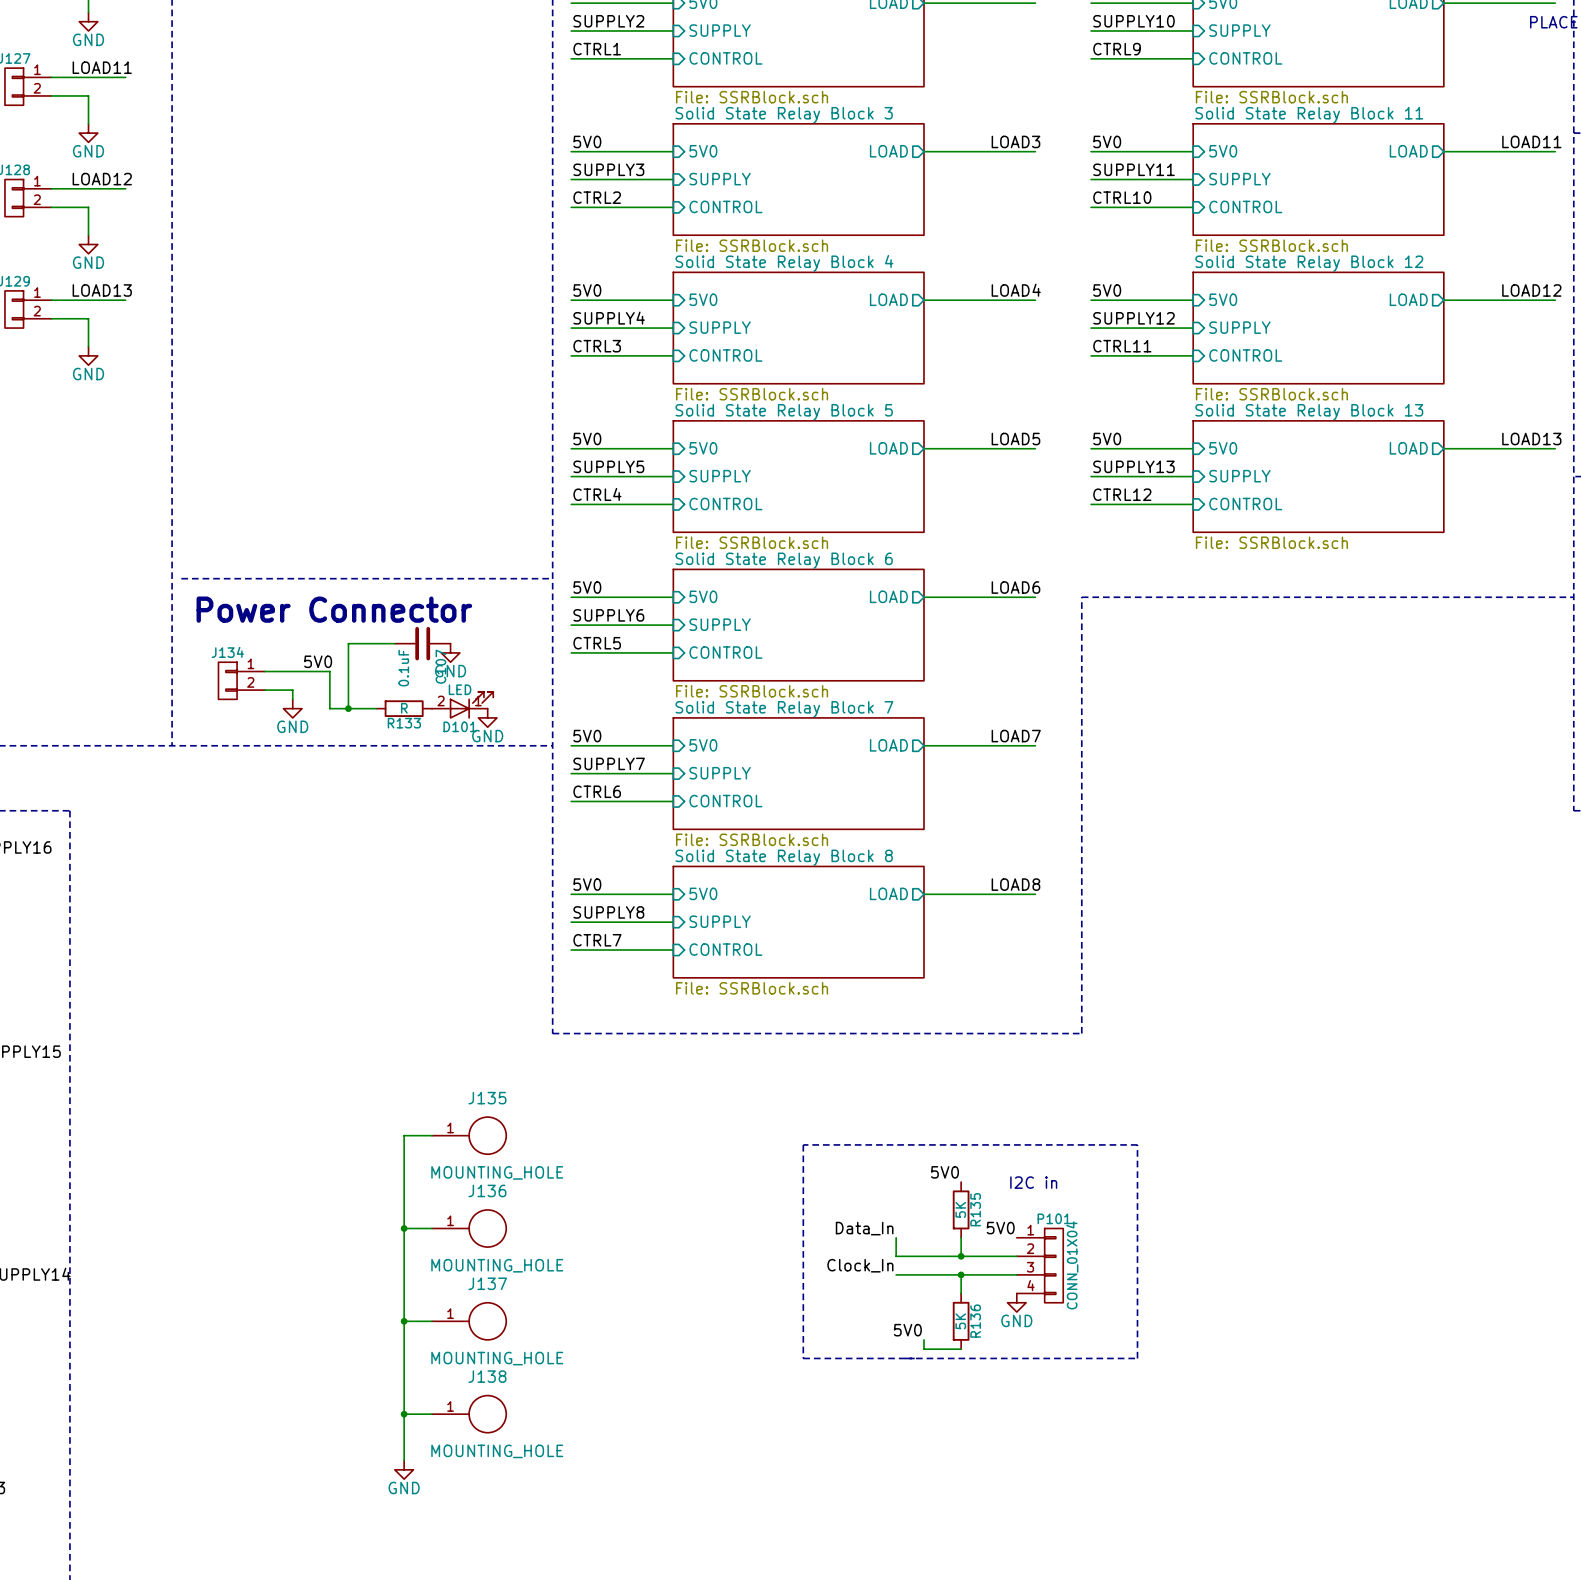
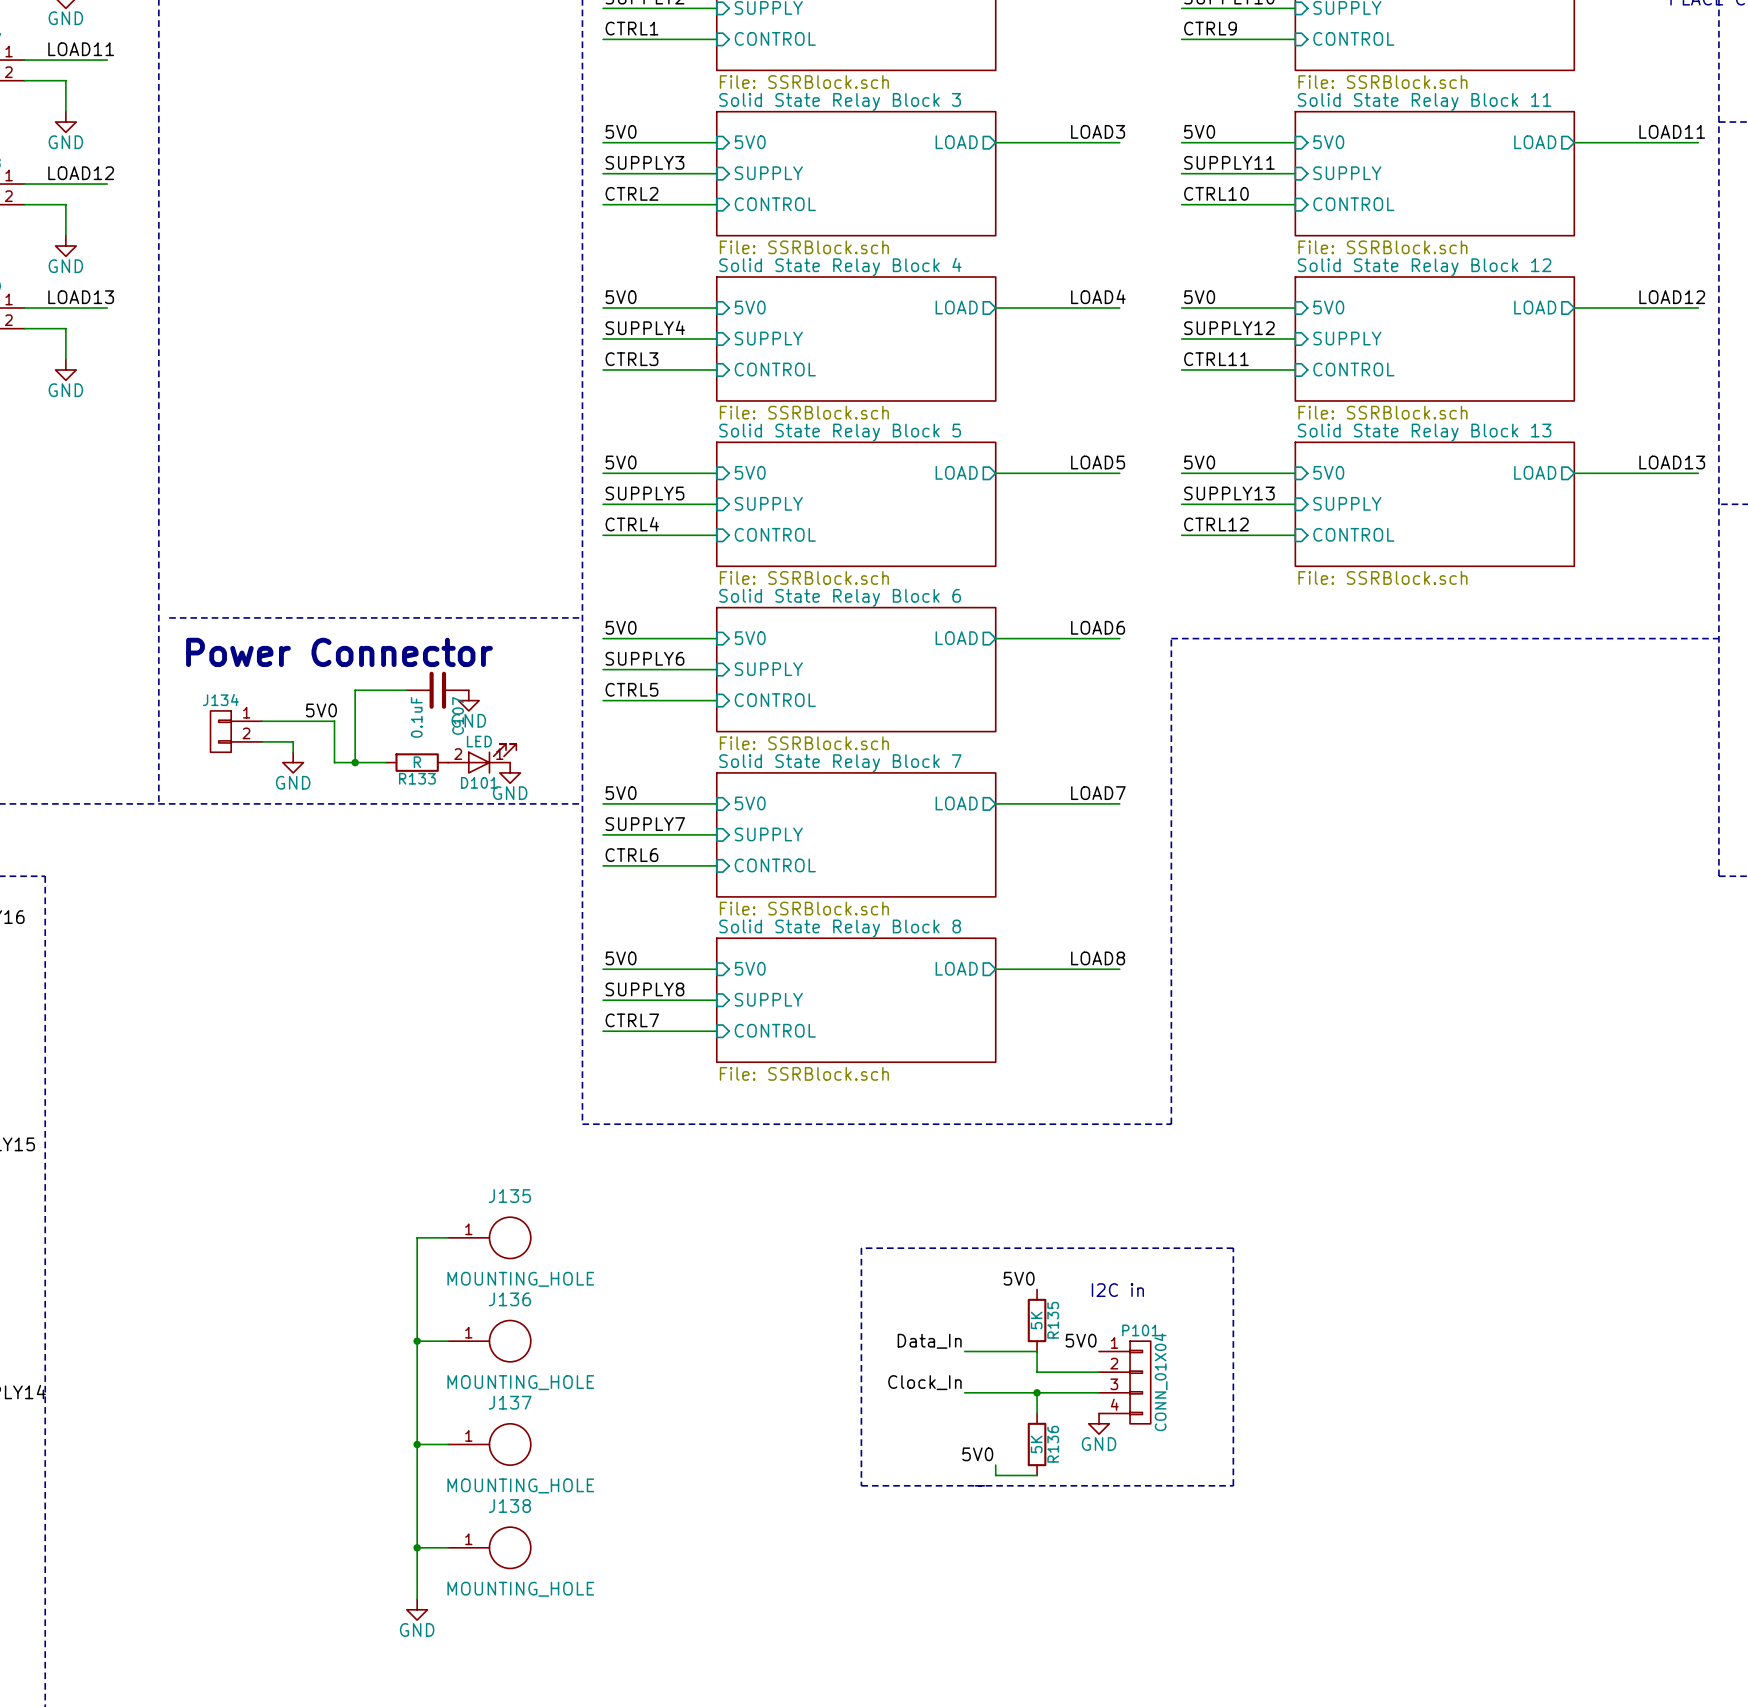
wire: (896, 1237) (896, 1256) (961, 1256) -> (964, 1351) (1037, 1351)
junction: (961, 1256) -> none

